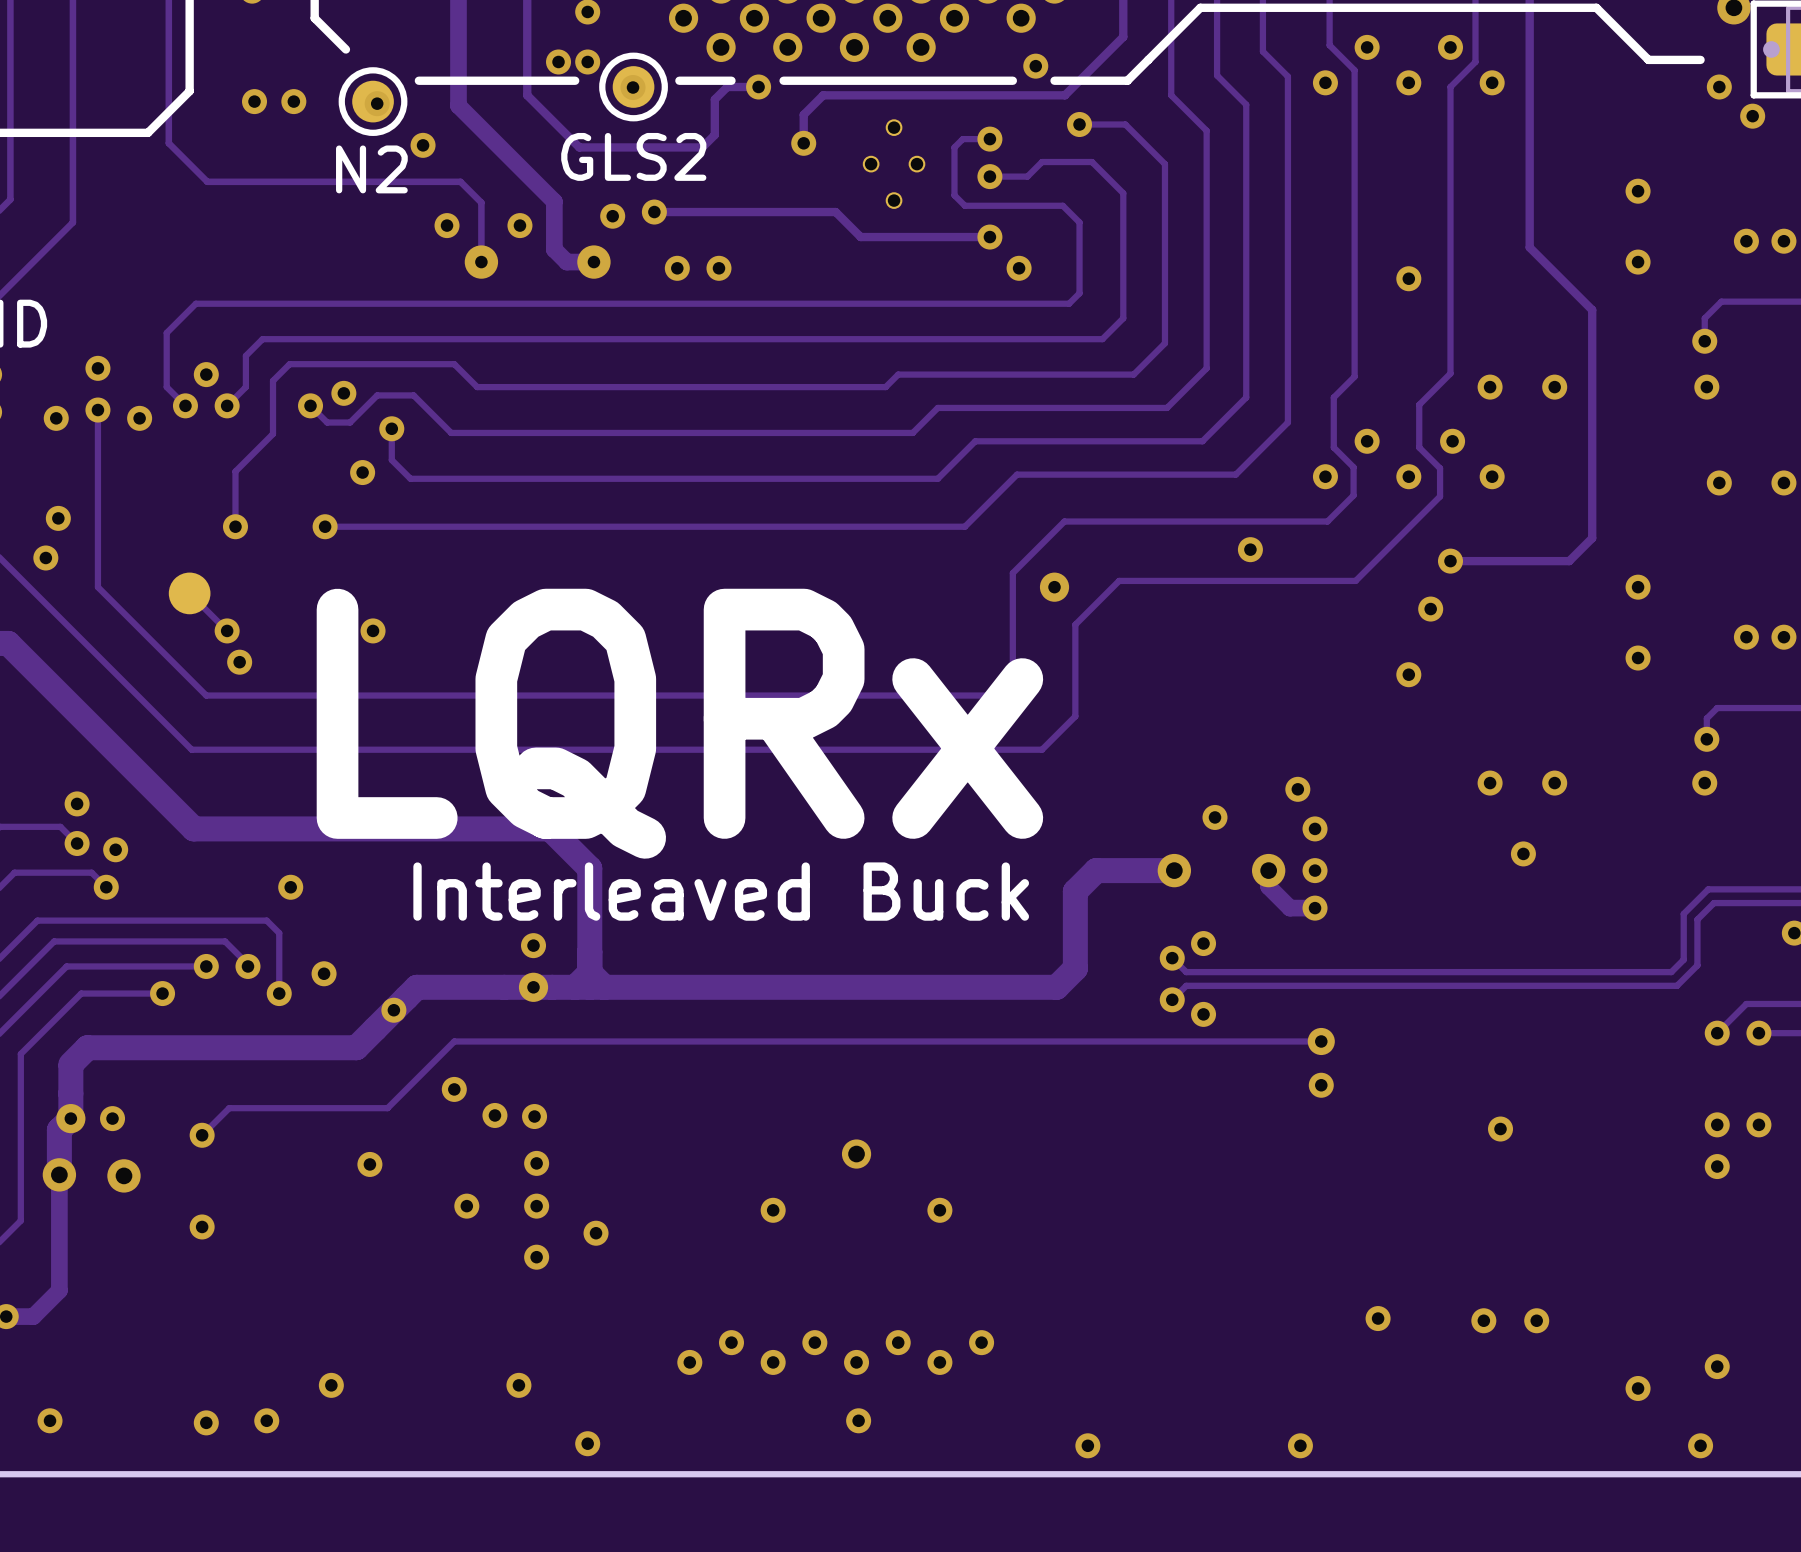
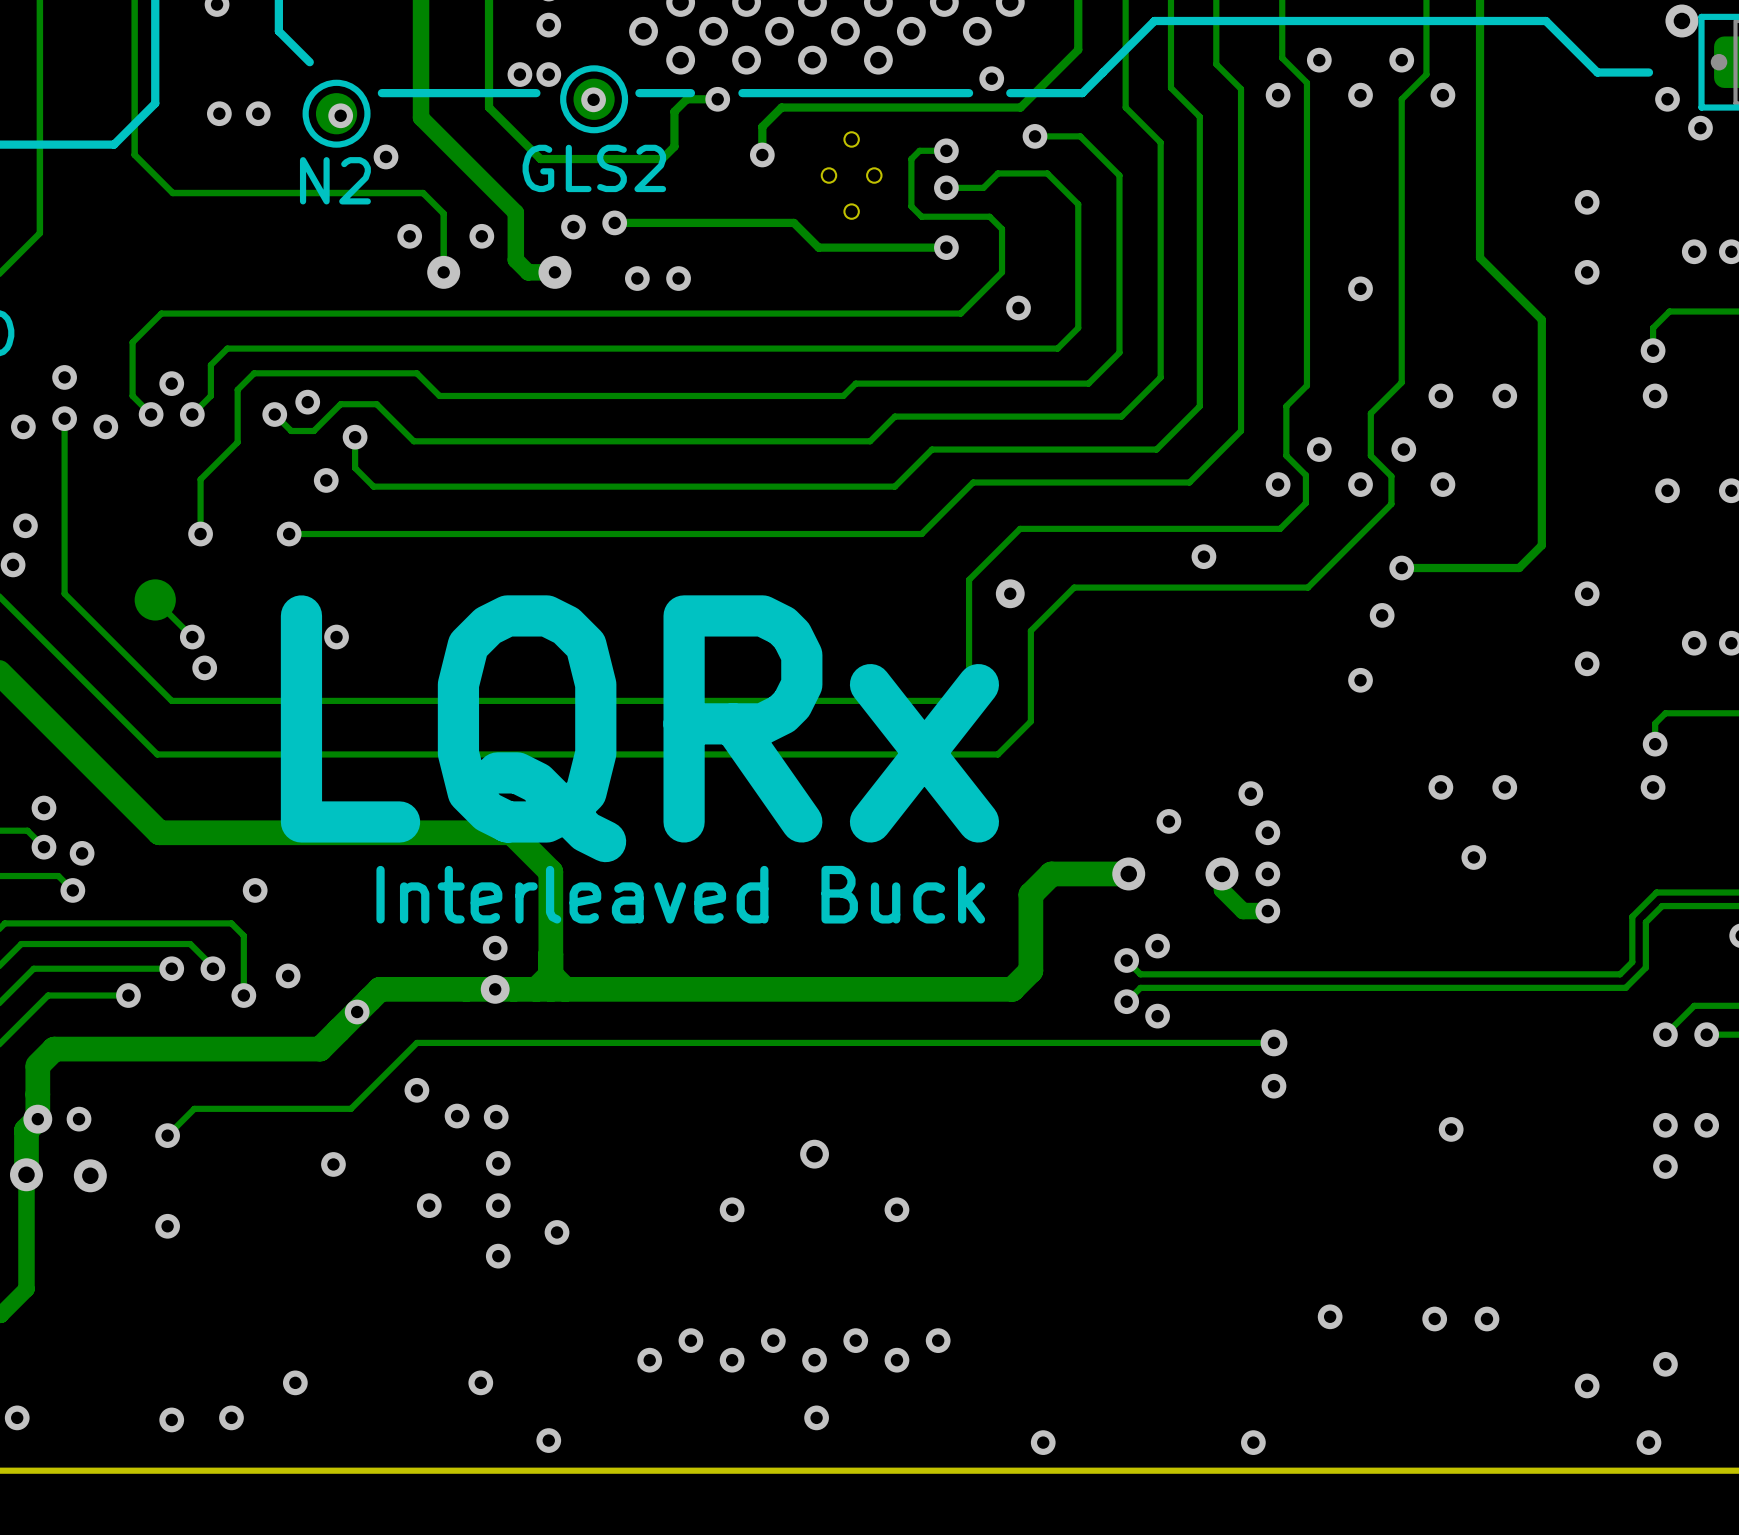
track: (1033, 205) (1062, 205) (1079, 222) (1079, 293) (1069, 303) (1004, 303) -> (989, 216) (1002, 229) (1002, 272) (960, 313)
via position: (1019, 268) -> (1018, 308)

